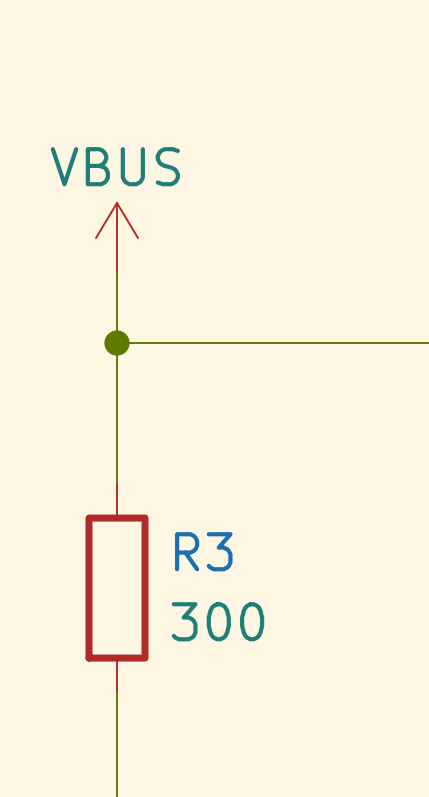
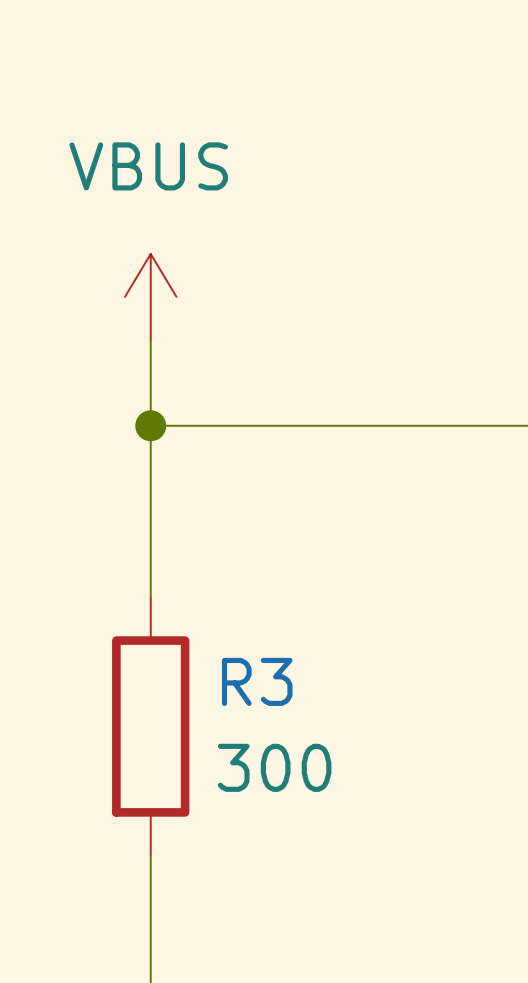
power symbol text position: VBUS (115, 166) -> VBUS (148, 166)

